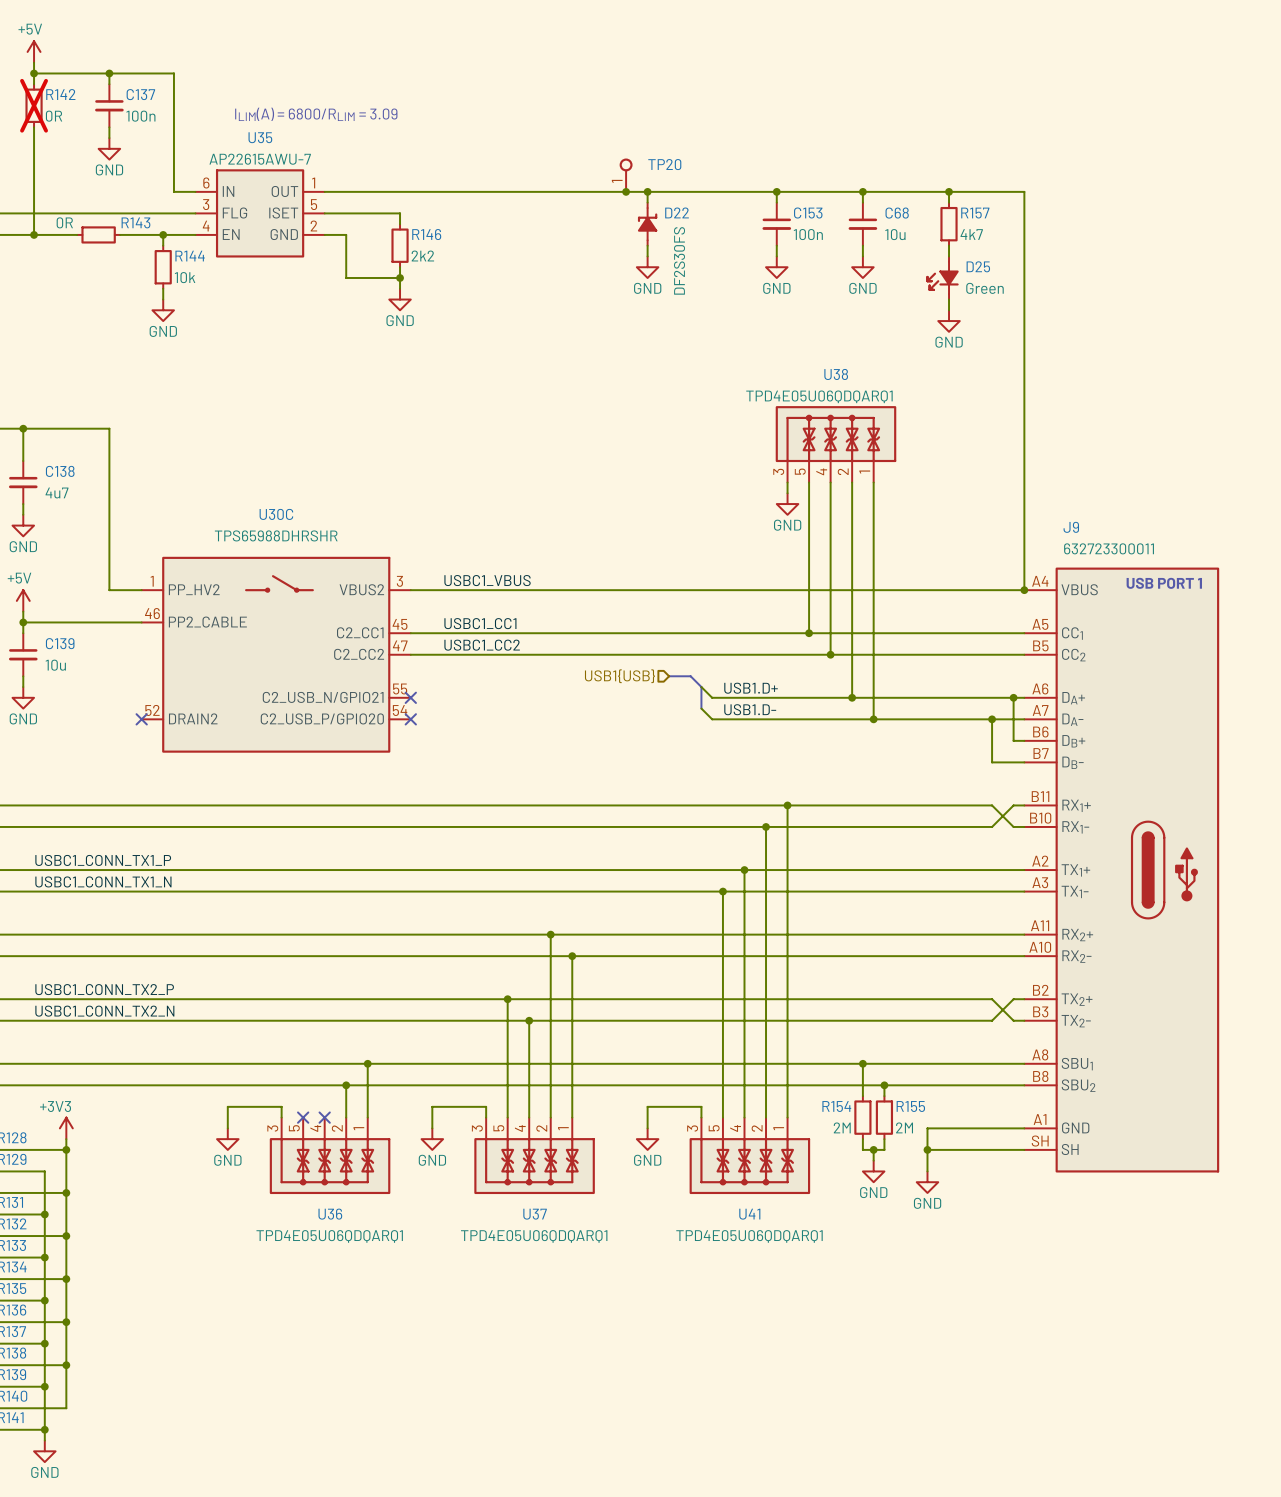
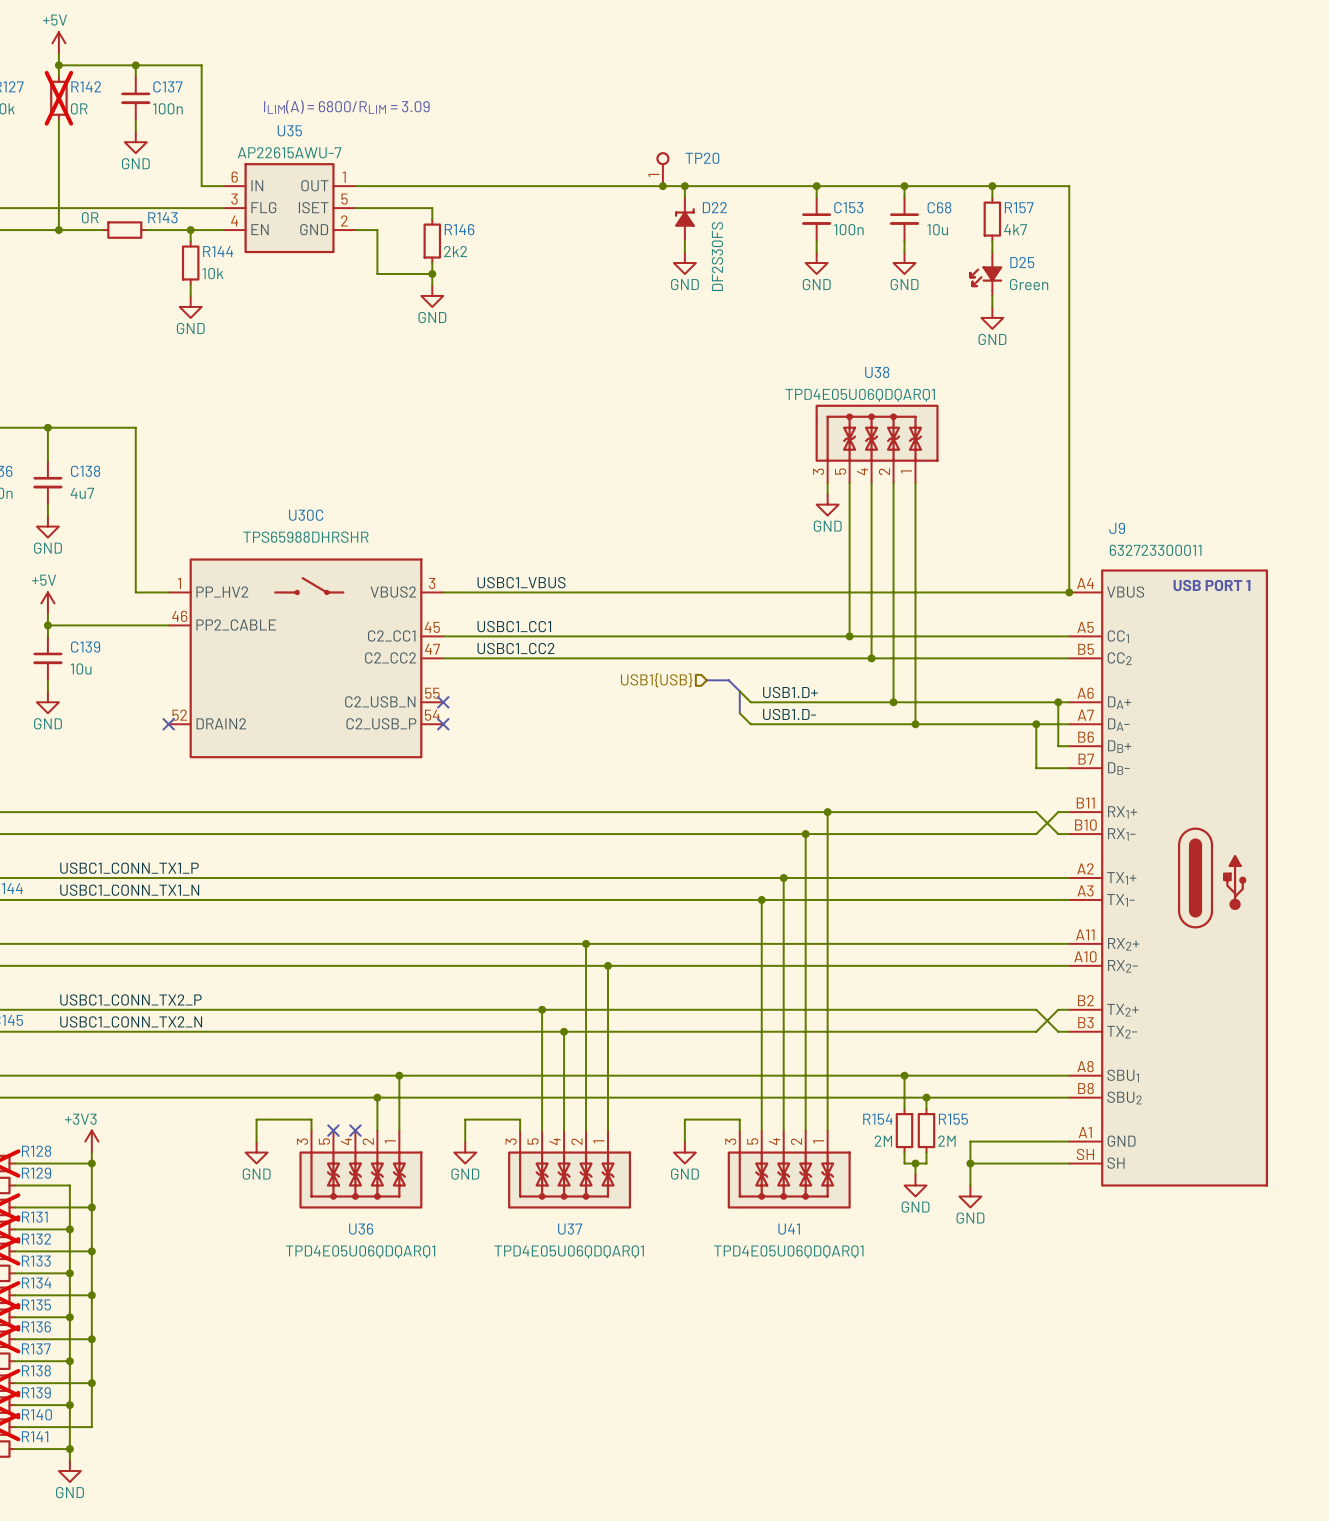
U30C pin name: C2_USB_N/GPIO21 (323, 697) -> C2_USB_N (380, 701)
U30C pin name: C2_USB_P/GPIO20 (322, 718) -> C2_USB_P (381, 723)

